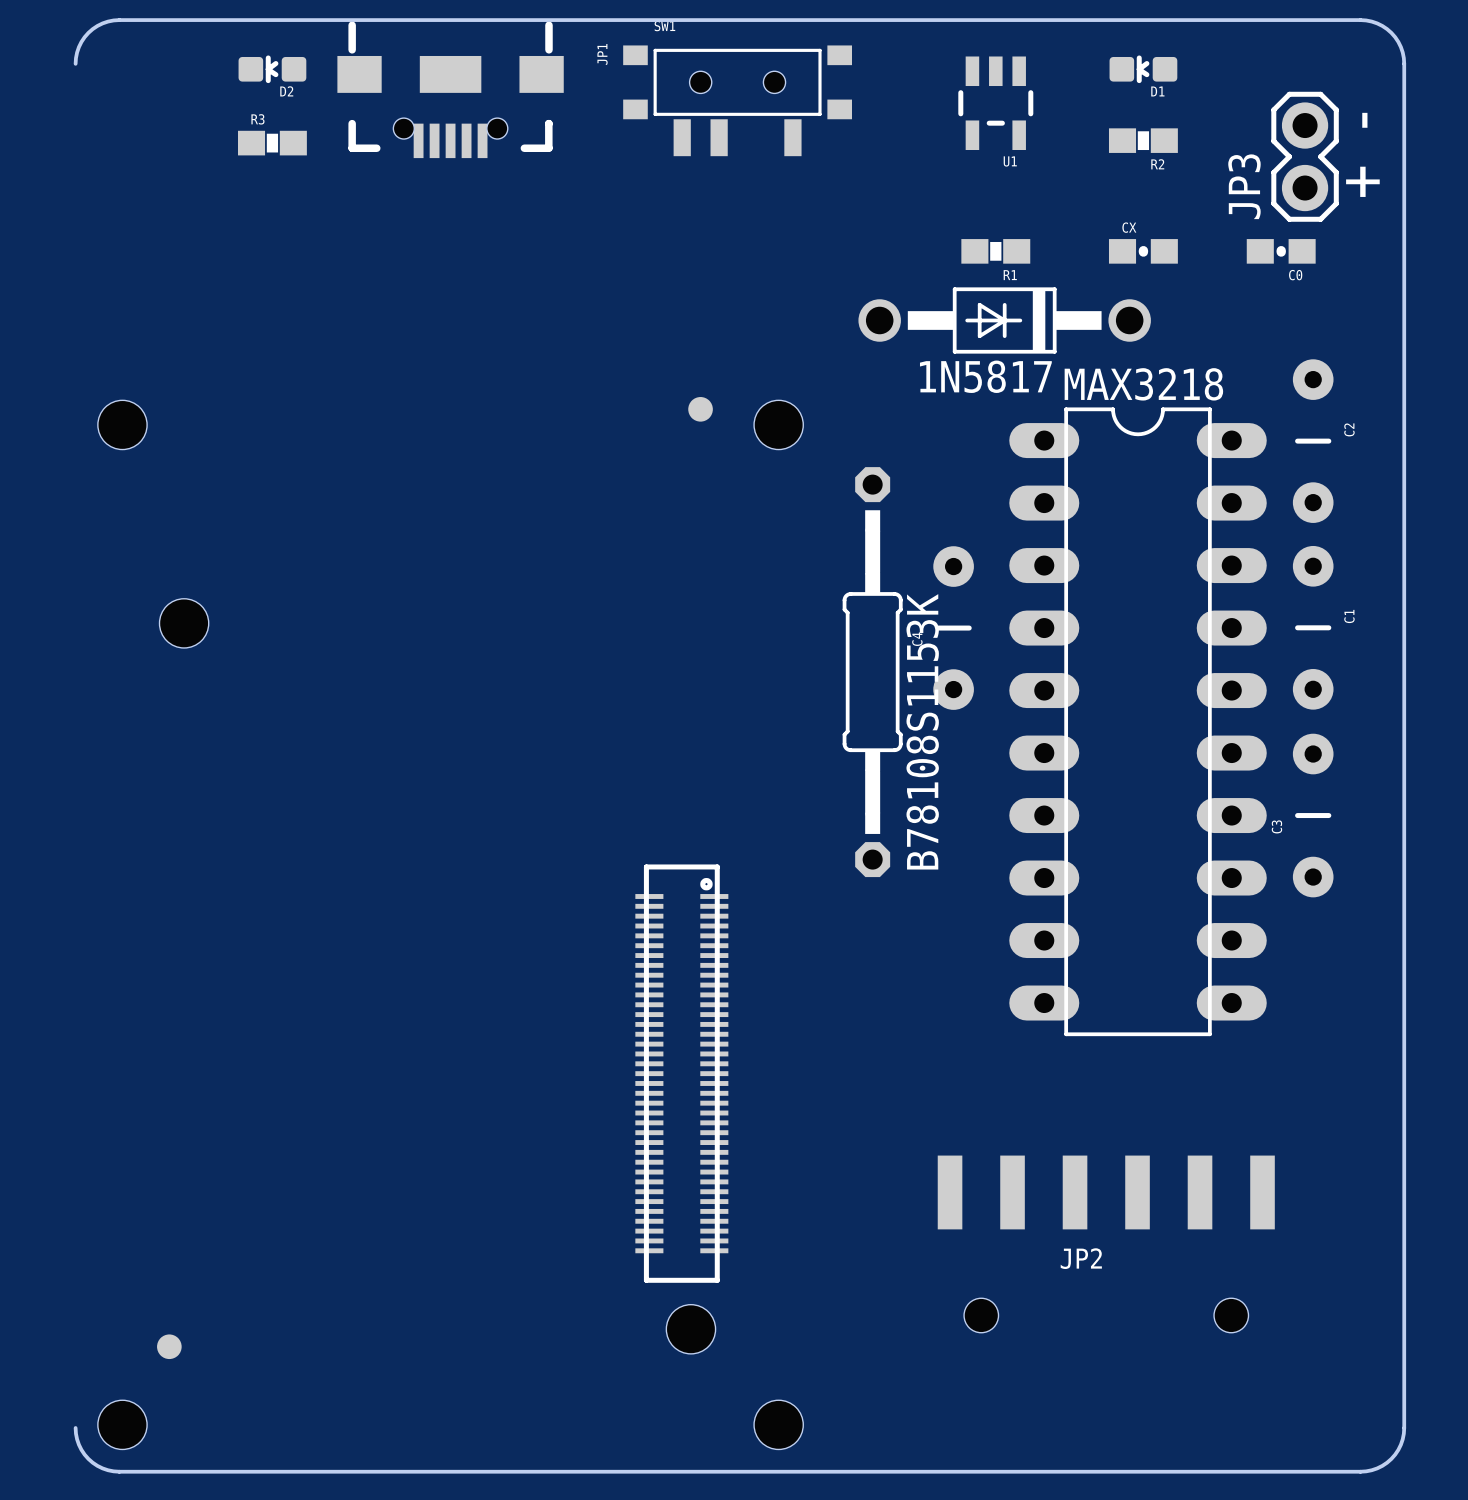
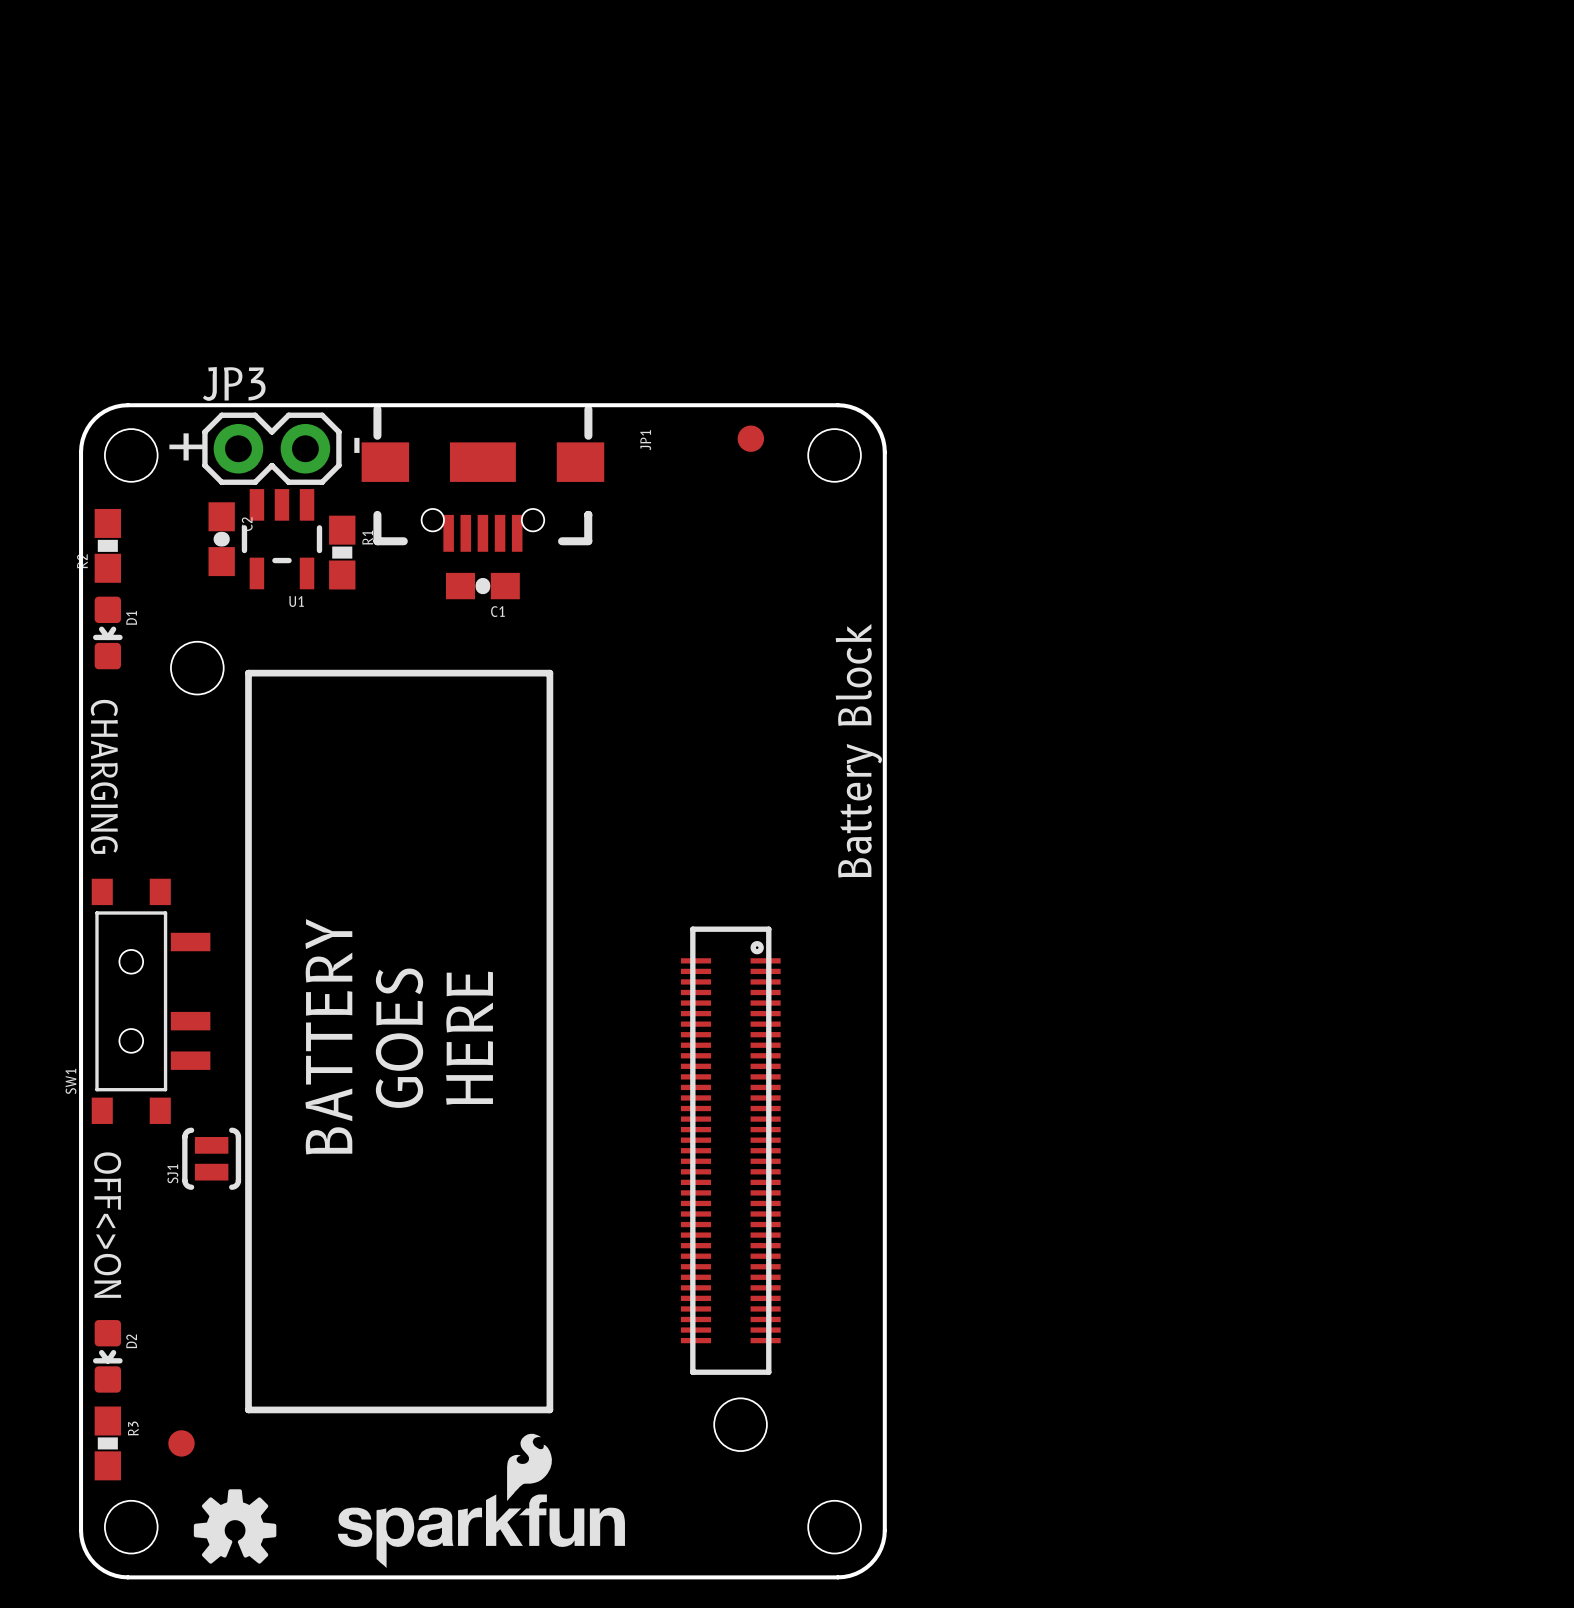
board edge: (75, 63) (78, 47) (88, 32) (102, 23) (119, 20) (1360, 20) (1382, 25) (1398, 41) (1404, 63) (1404, 1427) (1400, 1444) (1387, 1462) (1377, 1468) (1360, 1471) (781, 1471) -> (81, 1530) (81, 452) (84, 434) (90, 423) (99, 414) (109, 408) (127, 405) (837, 405) (855, 408) (871, 418) (881, 434) (884, 452) (884, 1530) (881, 1548) (871, 1563) (855, 1573) (837, 1577)
D2 rotation: 0° (272, 69) -> 90° counterclockwise (107, 1356)
D2 position: (272, 69) -> (107, 1356)
D1 rotation: 0° (1143, 69) -> 90° counterclockwise (107, 632)
D1 position: (1143, 69) -> (107, 632)
JP1 position: (450, 89) -> (482, 478)
SW1 rotation: 0° (737, 100) -> 90° counterclockwise (151, 1001)
SW1 position: (737, 100) -> (151, 1001)
U1 position: (995, 103) -> (281, 539)
text: - (1364, 120) -> none
R2 rotation: 0° (1143, 140) -> 90° clockwise (107, 545)
R2 position: (1143, 140) -> (107, 545)
R3 rotation: 0° (272, 143) -> 90° clockwise (107, 1443)
R3 position: (272, 143) -> (107, 1443)
JP3 rotation: 0° (1305, 156) -> 90° clockwise (271, 448)
JP3 position: (1305, 156) -> (271, 448)
text: + (1362, 181) -> none
R1 rotation: 0° (995, 251) -> 90° clockwise (342, 552)
R1 position: (995, 251) -> (342, 552)
CX: (1143, 251) -> none
C0: (1281, 251) -> none
1N5817: (1004, 320) -> none
C2 footprint: [1292, 359, 1334, 523] -> [208, 502, 235, 577]
text: none -> + (186, 446)
text: none -> - (356, 445)
C1 footprint: [1292, 545, 1334, 710] -> [446, 572, 520, 600]
line: none -> (248, 673) (549, 673) (549, 1409) (248, 1409) (248, 673)
C4: (953, 628) -> none
text: none -> Battery Block (858, 750)
B78108S1153K: (872, 672) -> none
MAX3218: (1138, 721) -> none
text: none -> CHARGING (104, 776)
C3: (1313, 815) -> none
text: none -> BATTERY (328, 1036)
text: none -> HERE (469, 1038)
text: none -> GOES (399, 1038)
SJ1: none -> (211, 1158)
text: none -> OFF<>ON (107, 1225)
JP2: (1106, 1244) -> none
drawing: none -> [337, 1433, 625, 1569]
drawing: none -> [193, 1489, 277, 1564]

